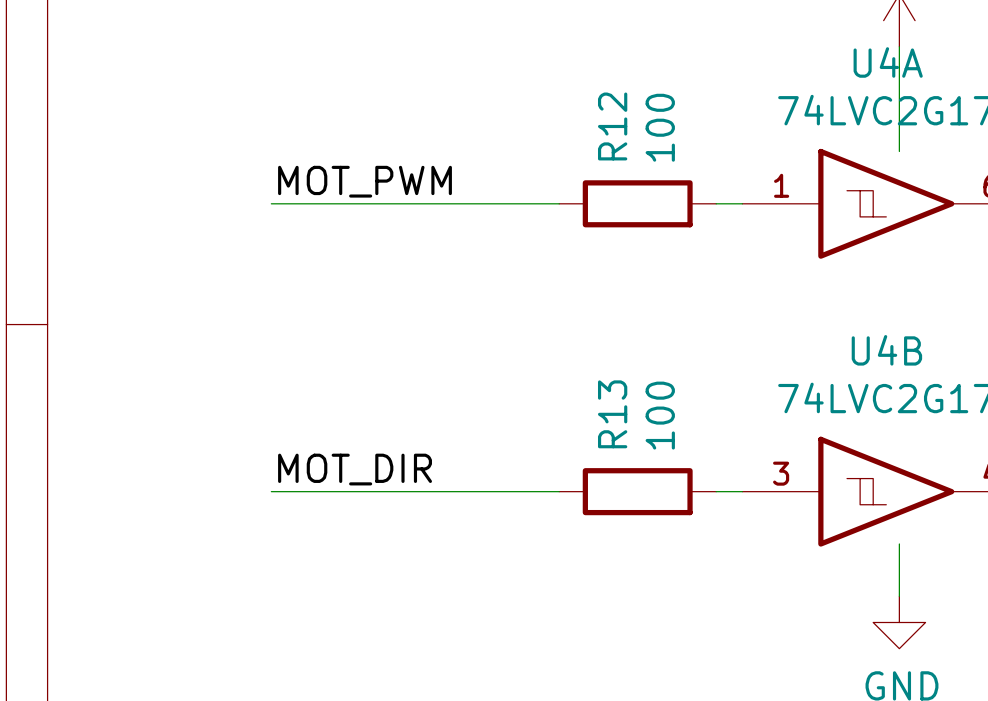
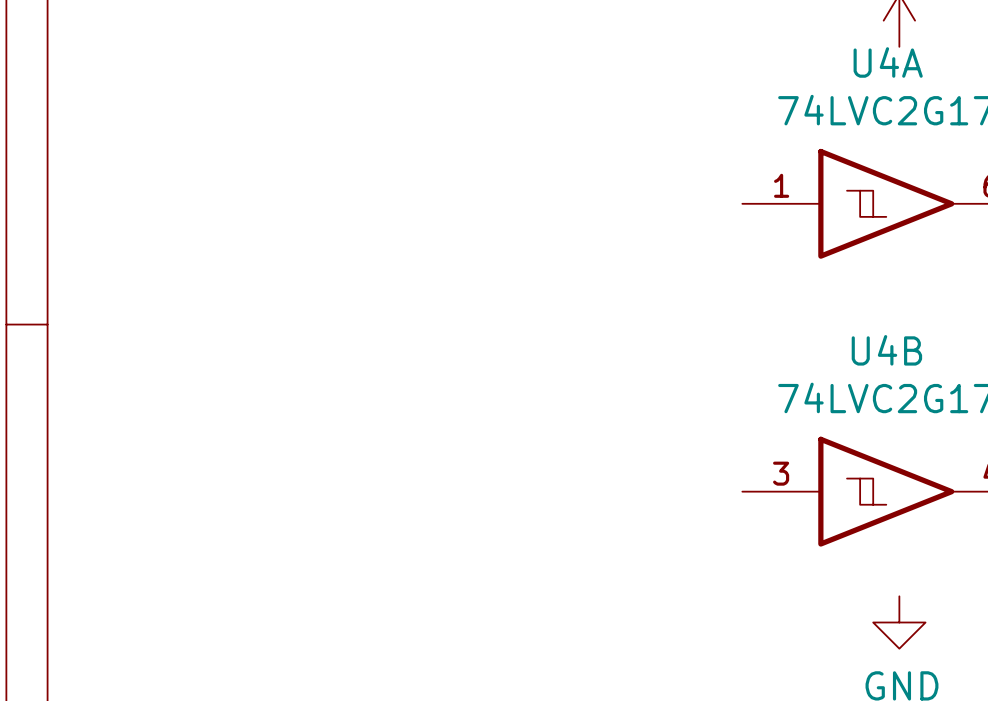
wire: (899, 46) (899, 151) -> none
label: MOT_PWM (365, 181) -> none
wire: (271, 203) (559, 203) -> none
R12: 100 (637, 203) -> none
wire: (716, 203) (742, 203) -> none
label: MOT_DIR (355, 469) -> none
wire: (271, 491) (559, 491) -> none
R13: 100 (637, 491) -> none
wire: (716, 491) (742, 491) -> none
wire: (899, 543) (899, 596) -> none

